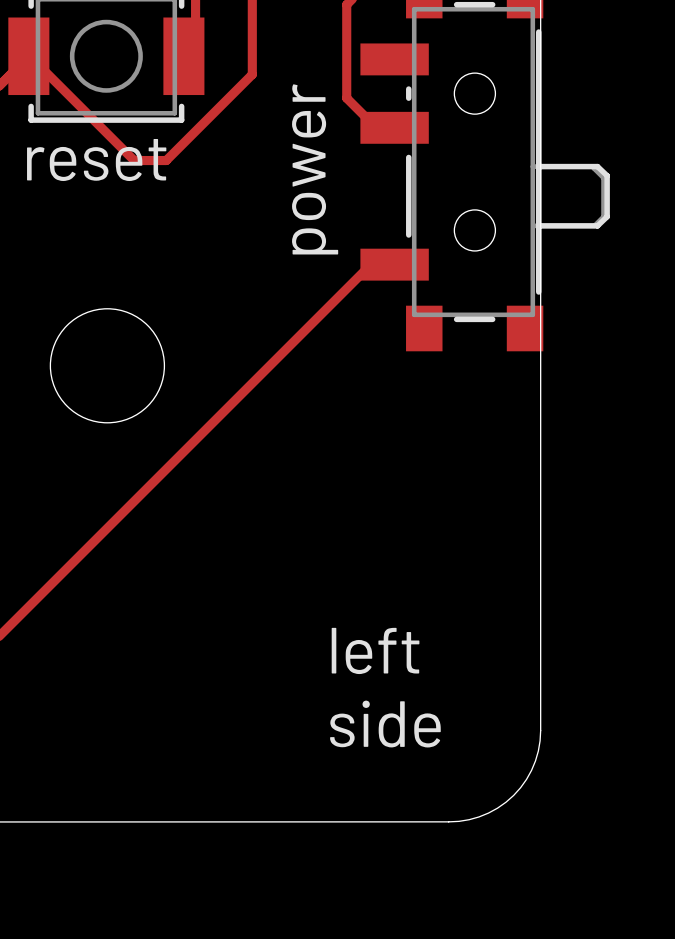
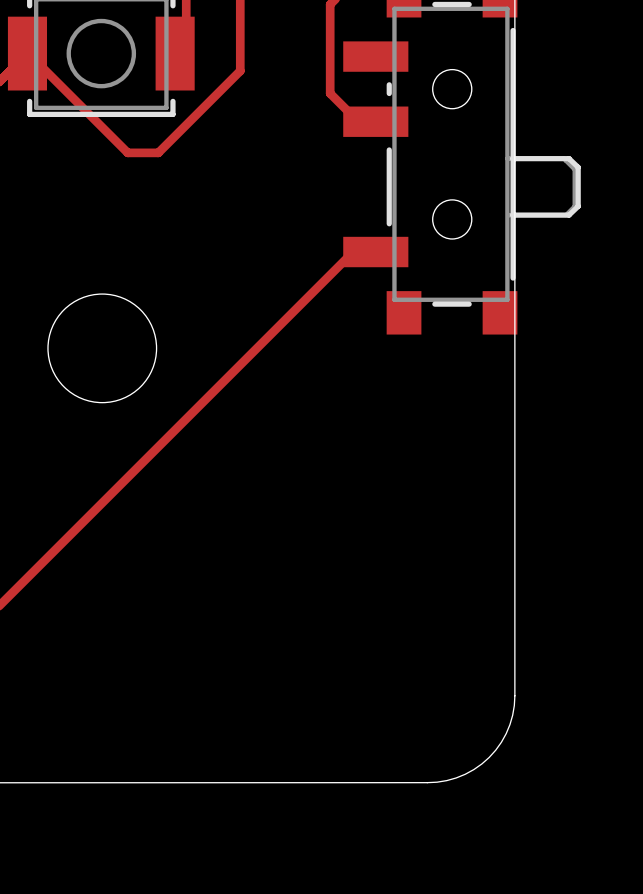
text: reset (96, 160) -> none
text: power (315, 169) -> none
text: left (375, 650) -> none
text: side (385, 724) -> none

